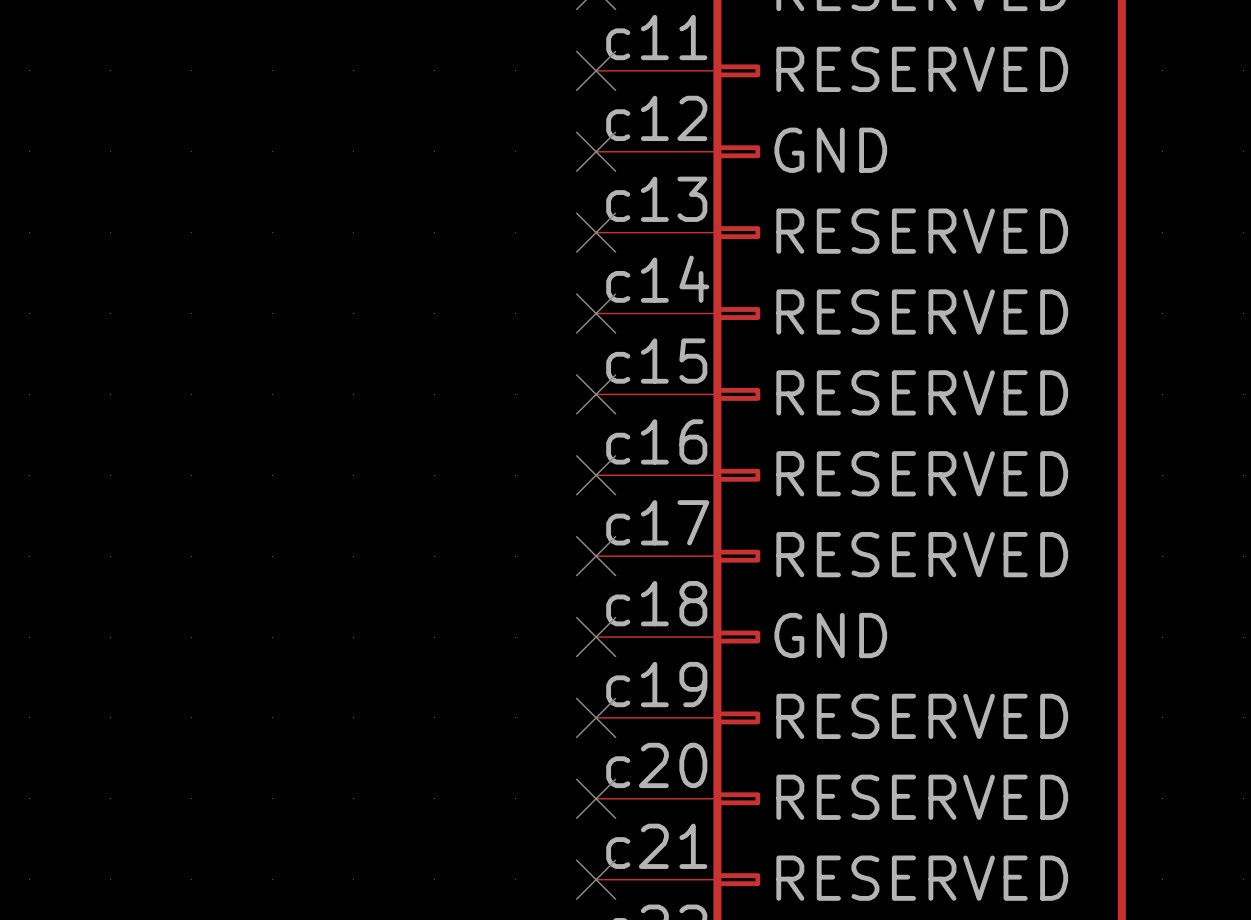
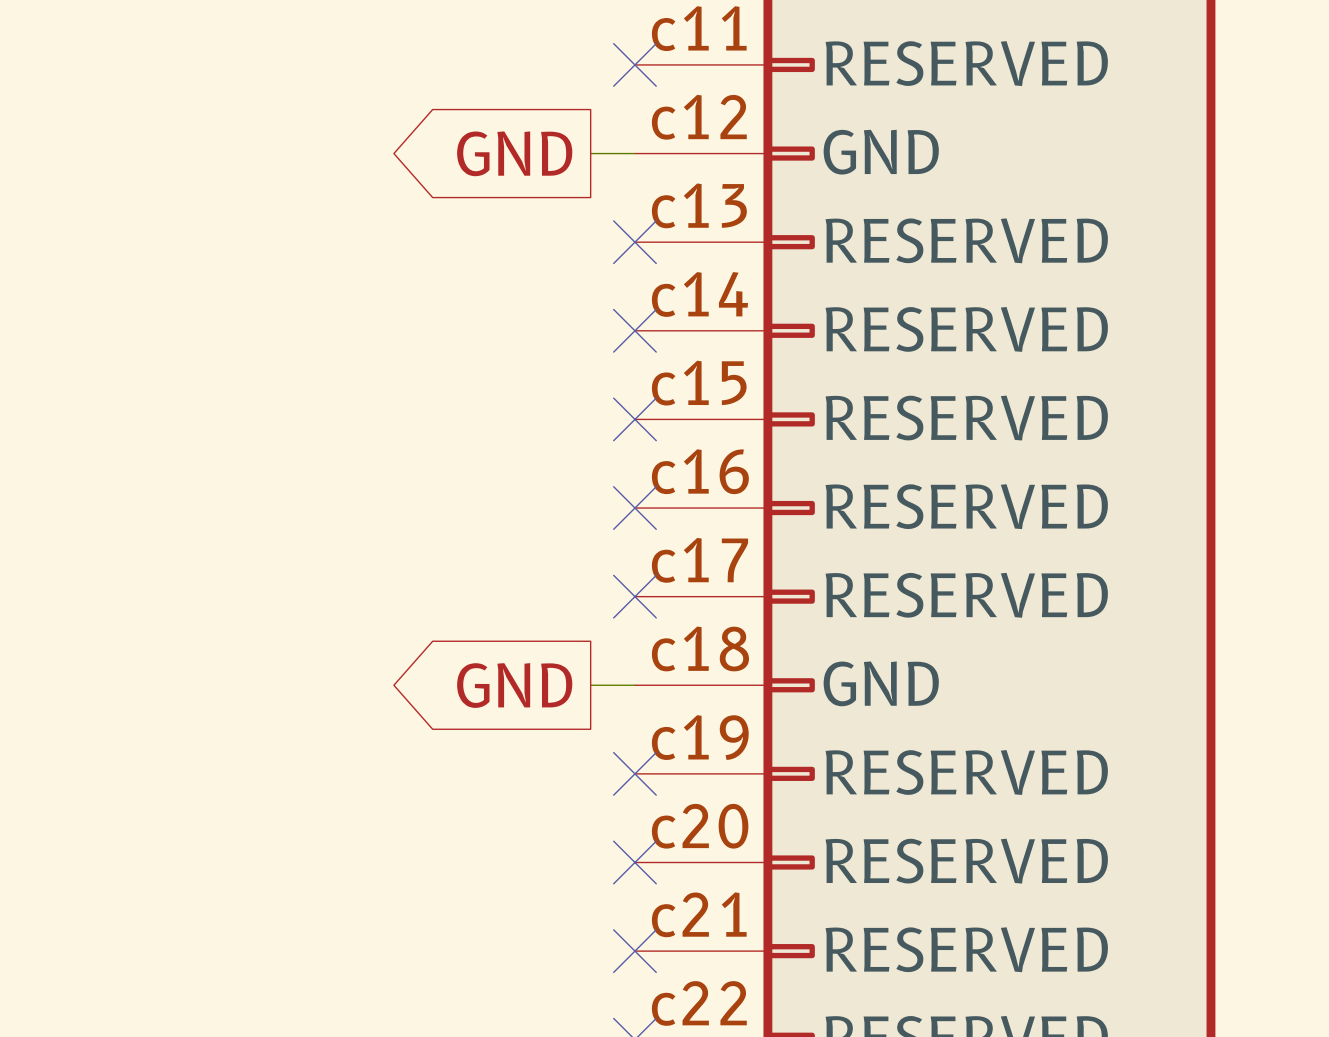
global label: none -> GND (514, 153)
wire: none -> (590, 153) (634, 153)
no-connect mark: (596, 151) -> none
global label: none -> GND (514, 685)
wire: none -> (590, 685) (634, 685)
no-connect mark: (596, 637) -> none

